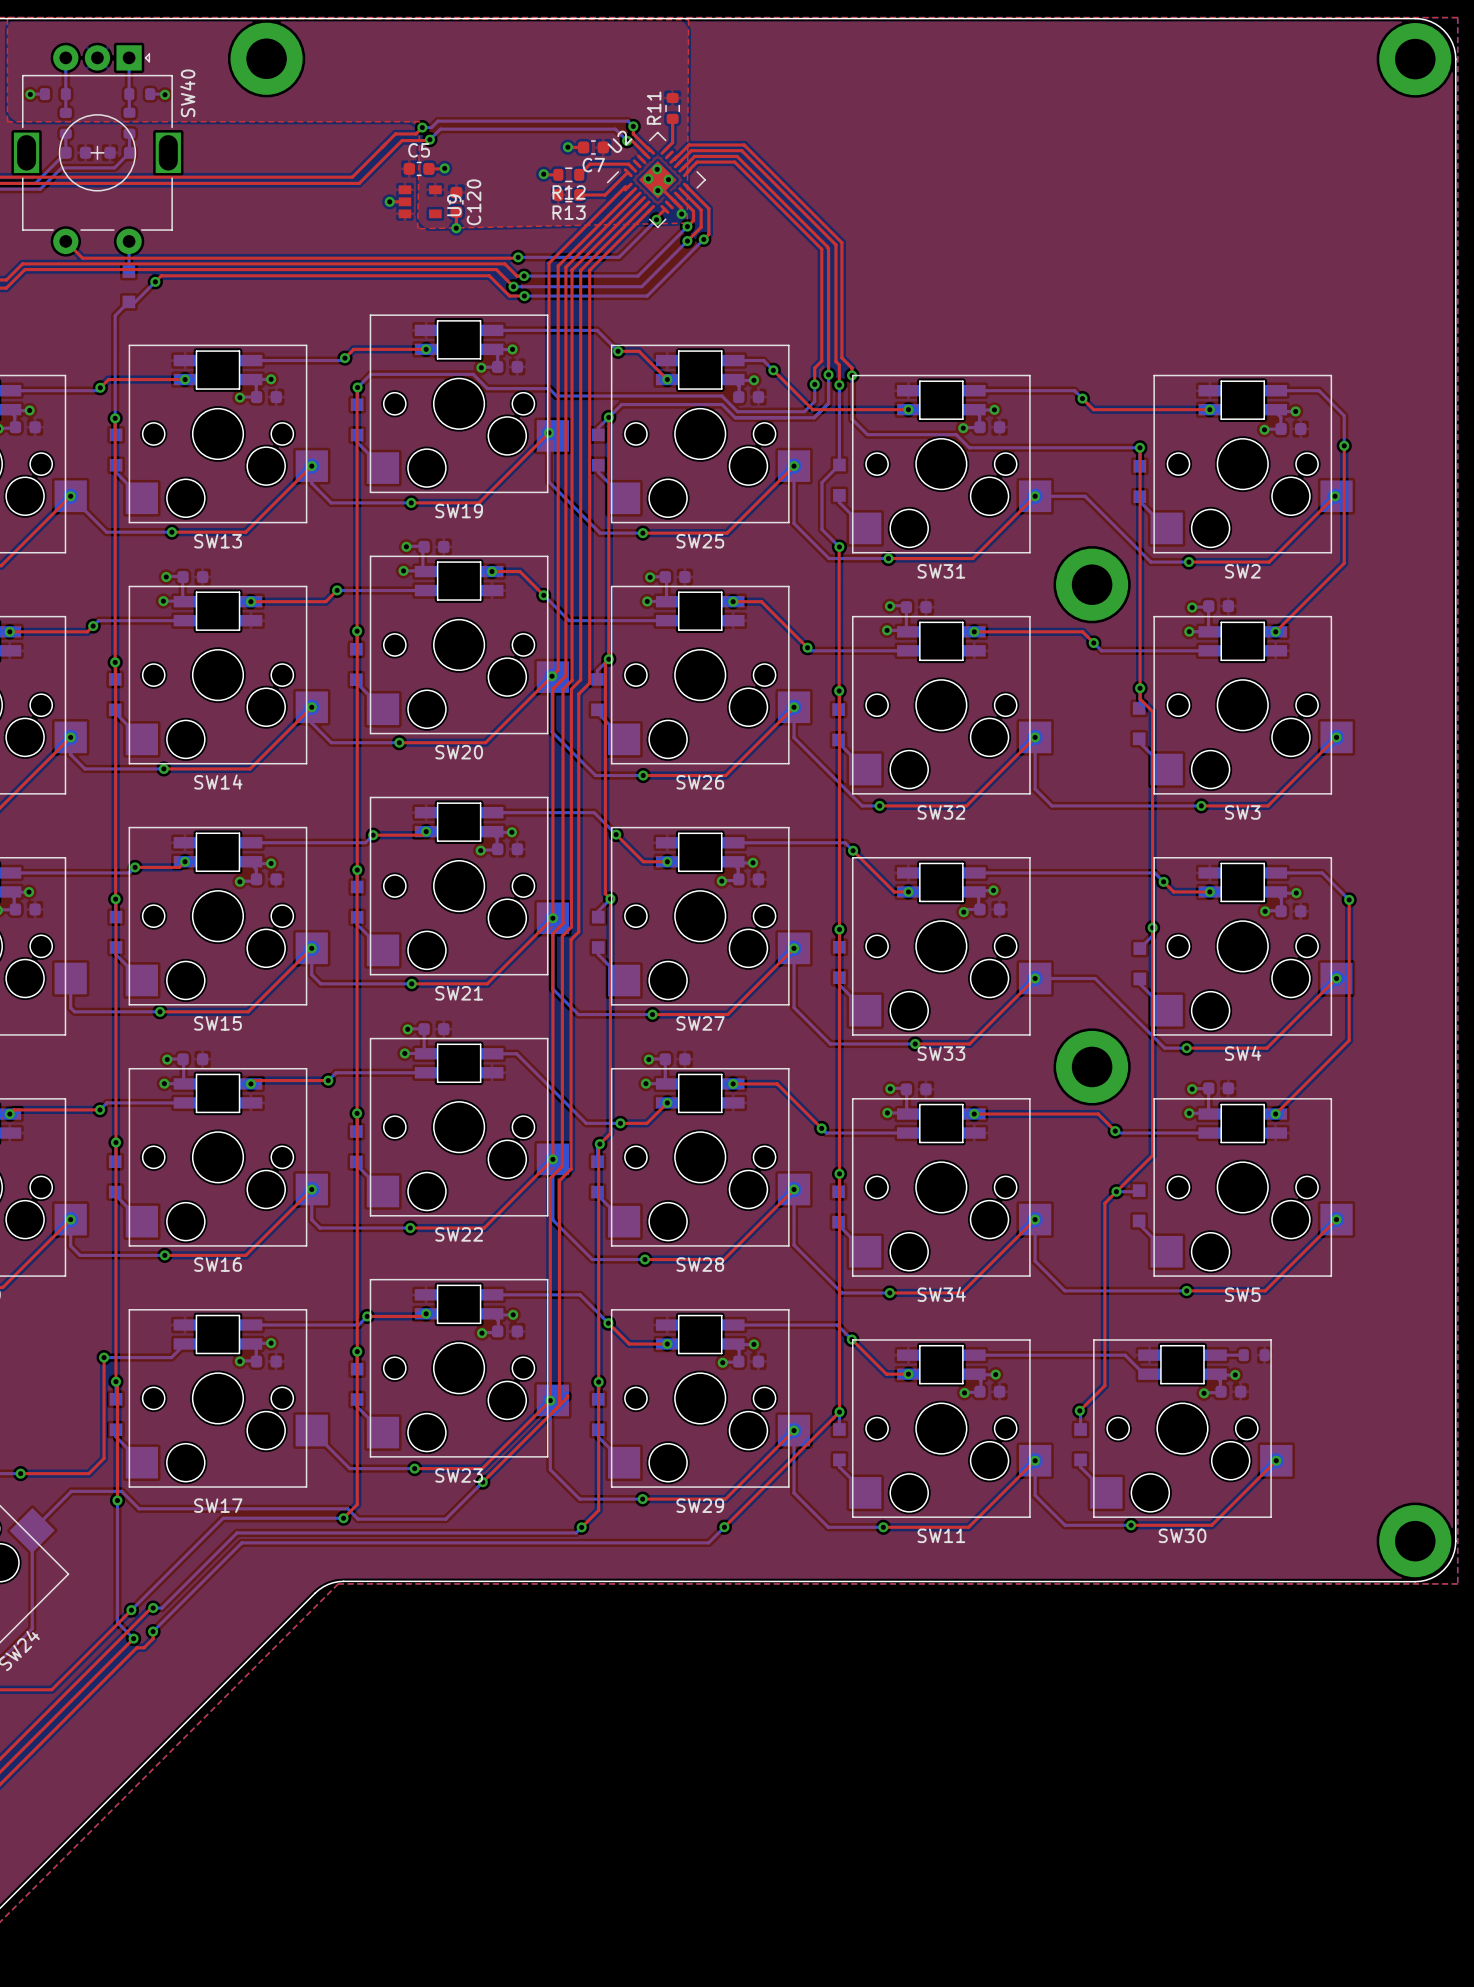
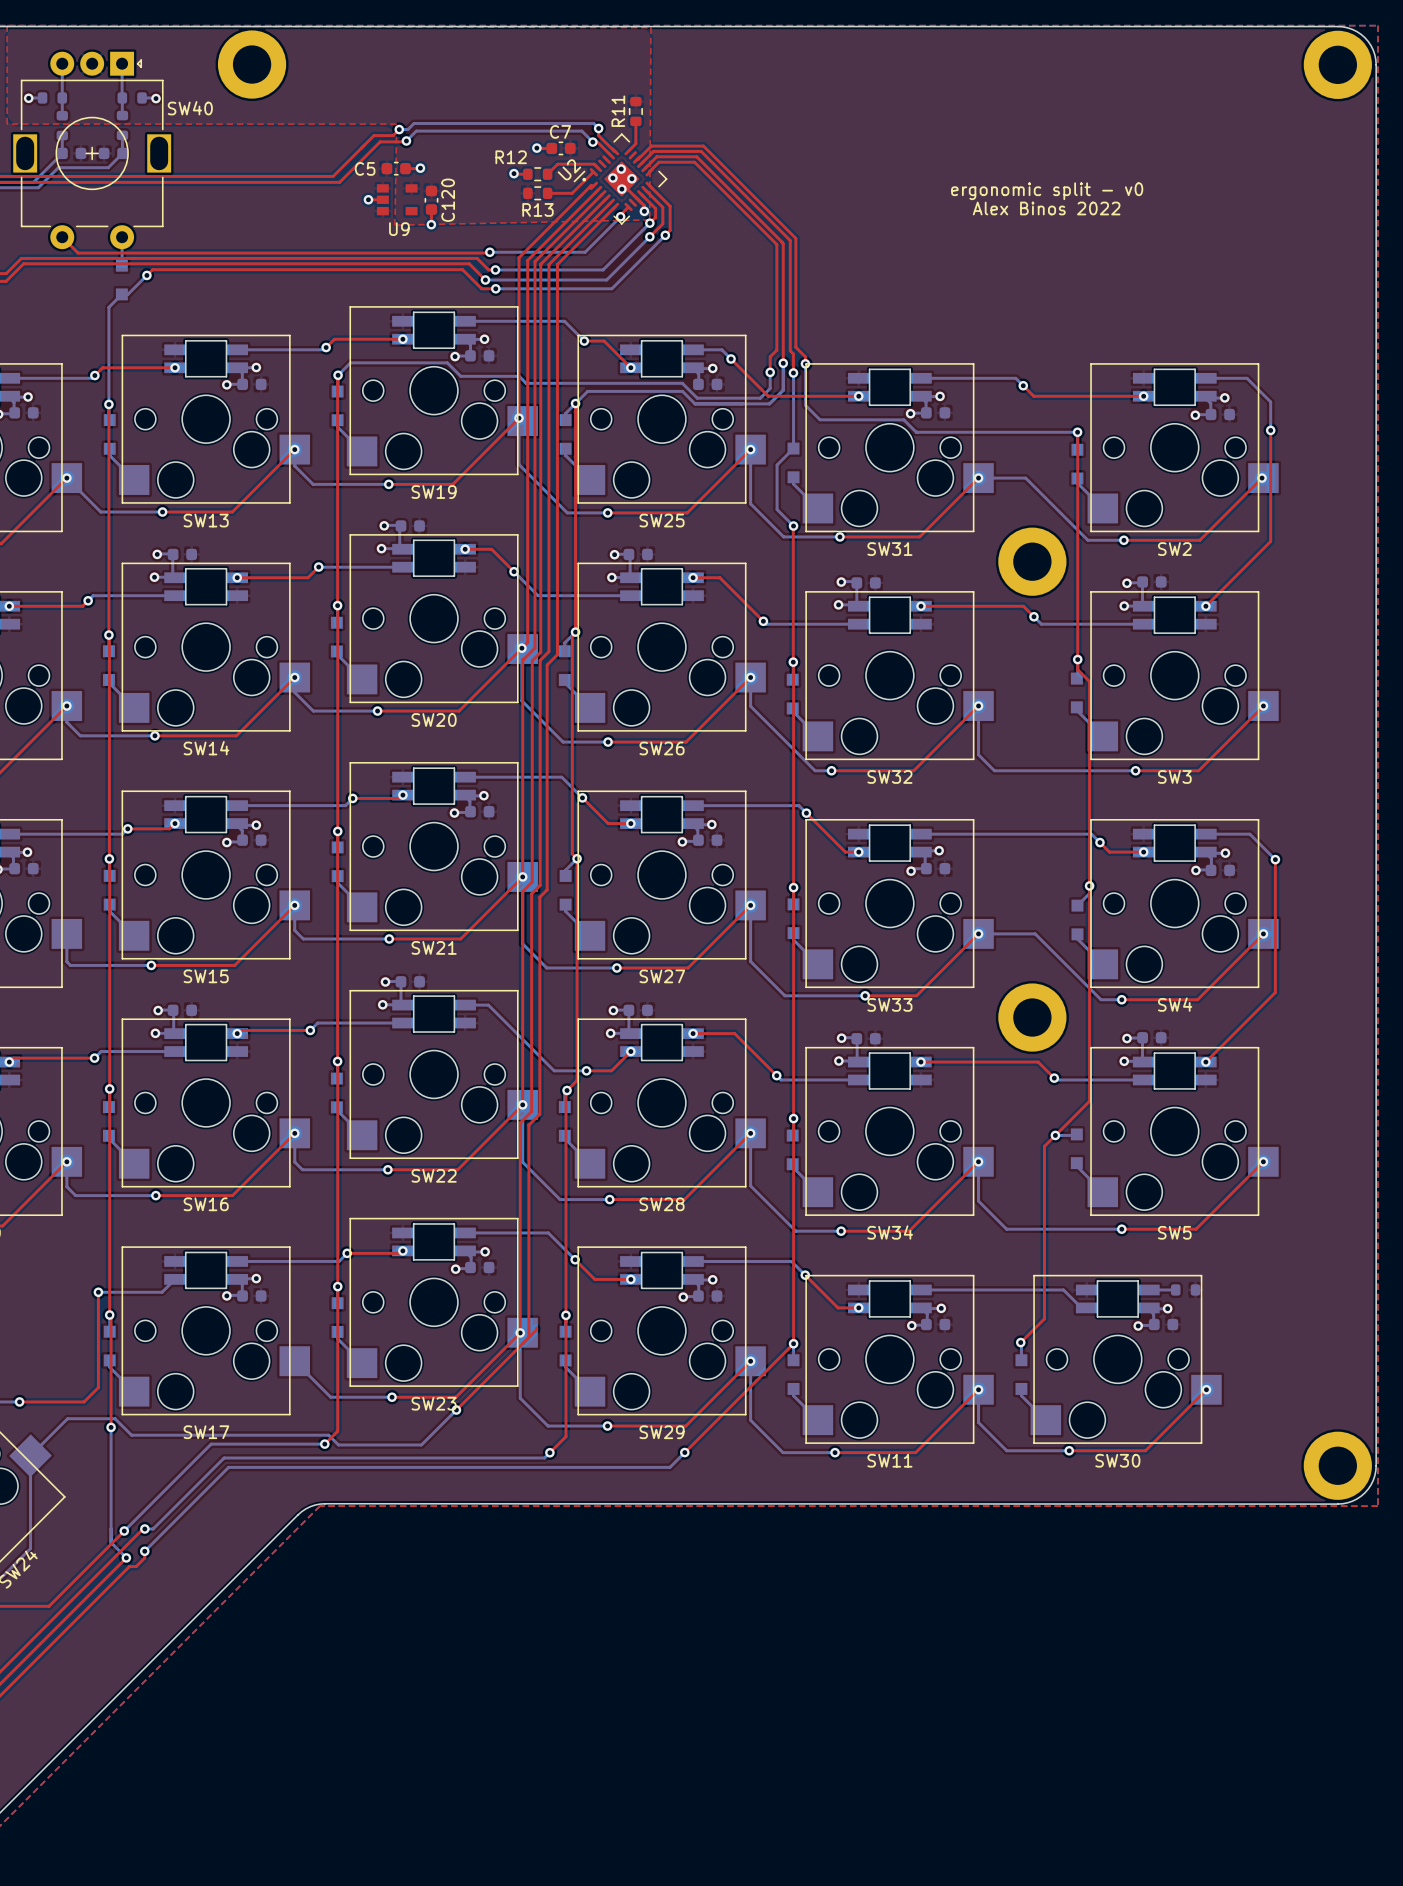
SW40 name rotation: 0° (187, 93) -> 90° clockwise (190, 108)
U2 name position: U2 (620, 141) -> U2 (569, 169)
C5 name position: C5 (419, 150) -> C5 (365, 168)
C7 name position: C7 (593, 165) -> C7 (560, 131)
drawing: none -> [582, 177, 587, 182]
R12 name position: R12 (569, 192) -> R12 (511, 157)
text: none -> ergonomic split - v0 (1047, 191)
U9 name rotation: 0° (454, 205) -> 90° clockwise (399, 229)
U9 name position: U9 (454, 205) -> U9 (399, 229)
text: none -> Alex Binos 2022 (1046, 208)

